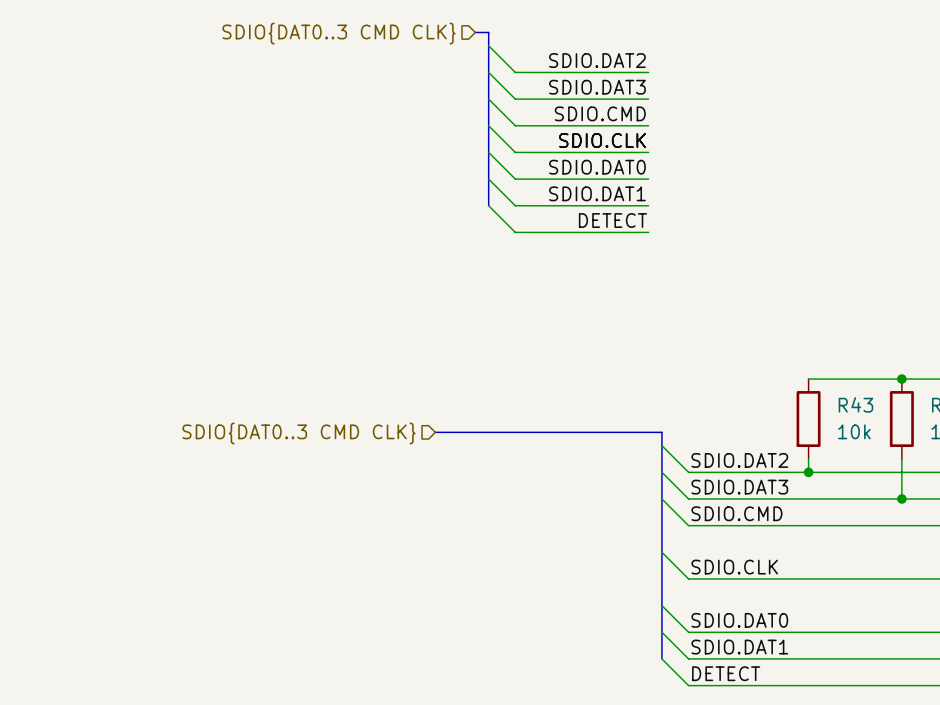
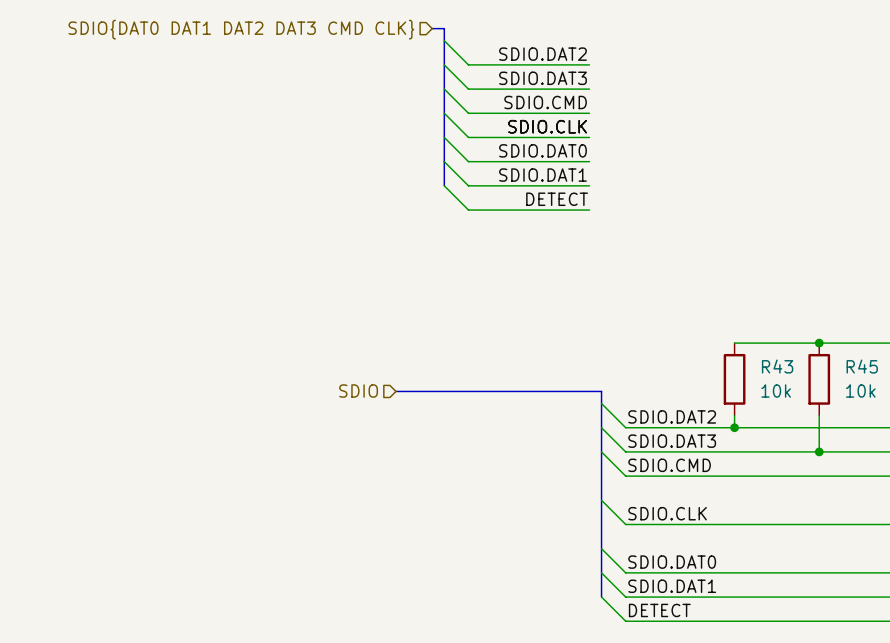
hierarchical label: SDIO{DAT0..3 CMD CLK} (338, 33) -> SDIO{DAT0 DAT1 DAT2 DAT3 CMD CLK} (241, 29)
hierarchical label: SDIO{DAT0..3 CMD CLK} (298, 433) -> SDIO (358, 391)

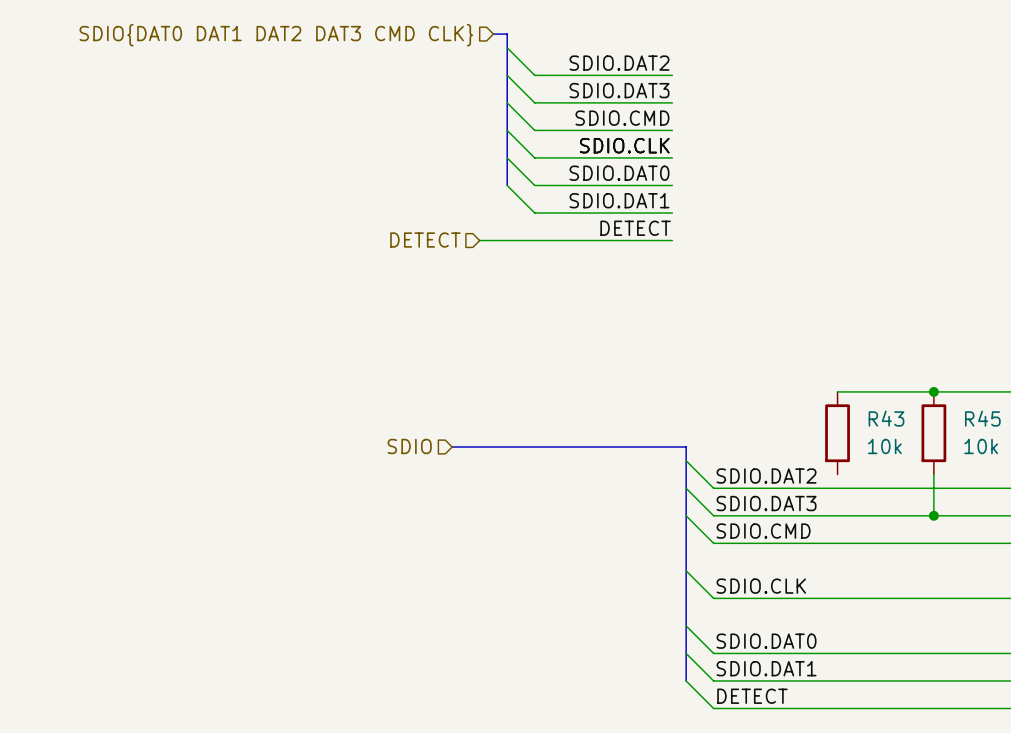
bus: (444, 161) (444, 185) -> none
wire: (444, 185) (468, 210) -> (479, 240) (534, 240)
hierarchical label: none -> DETECT (425, 240)
wire: (734, 415) (734, 427) -> none
junction: (734, 427) -> none

